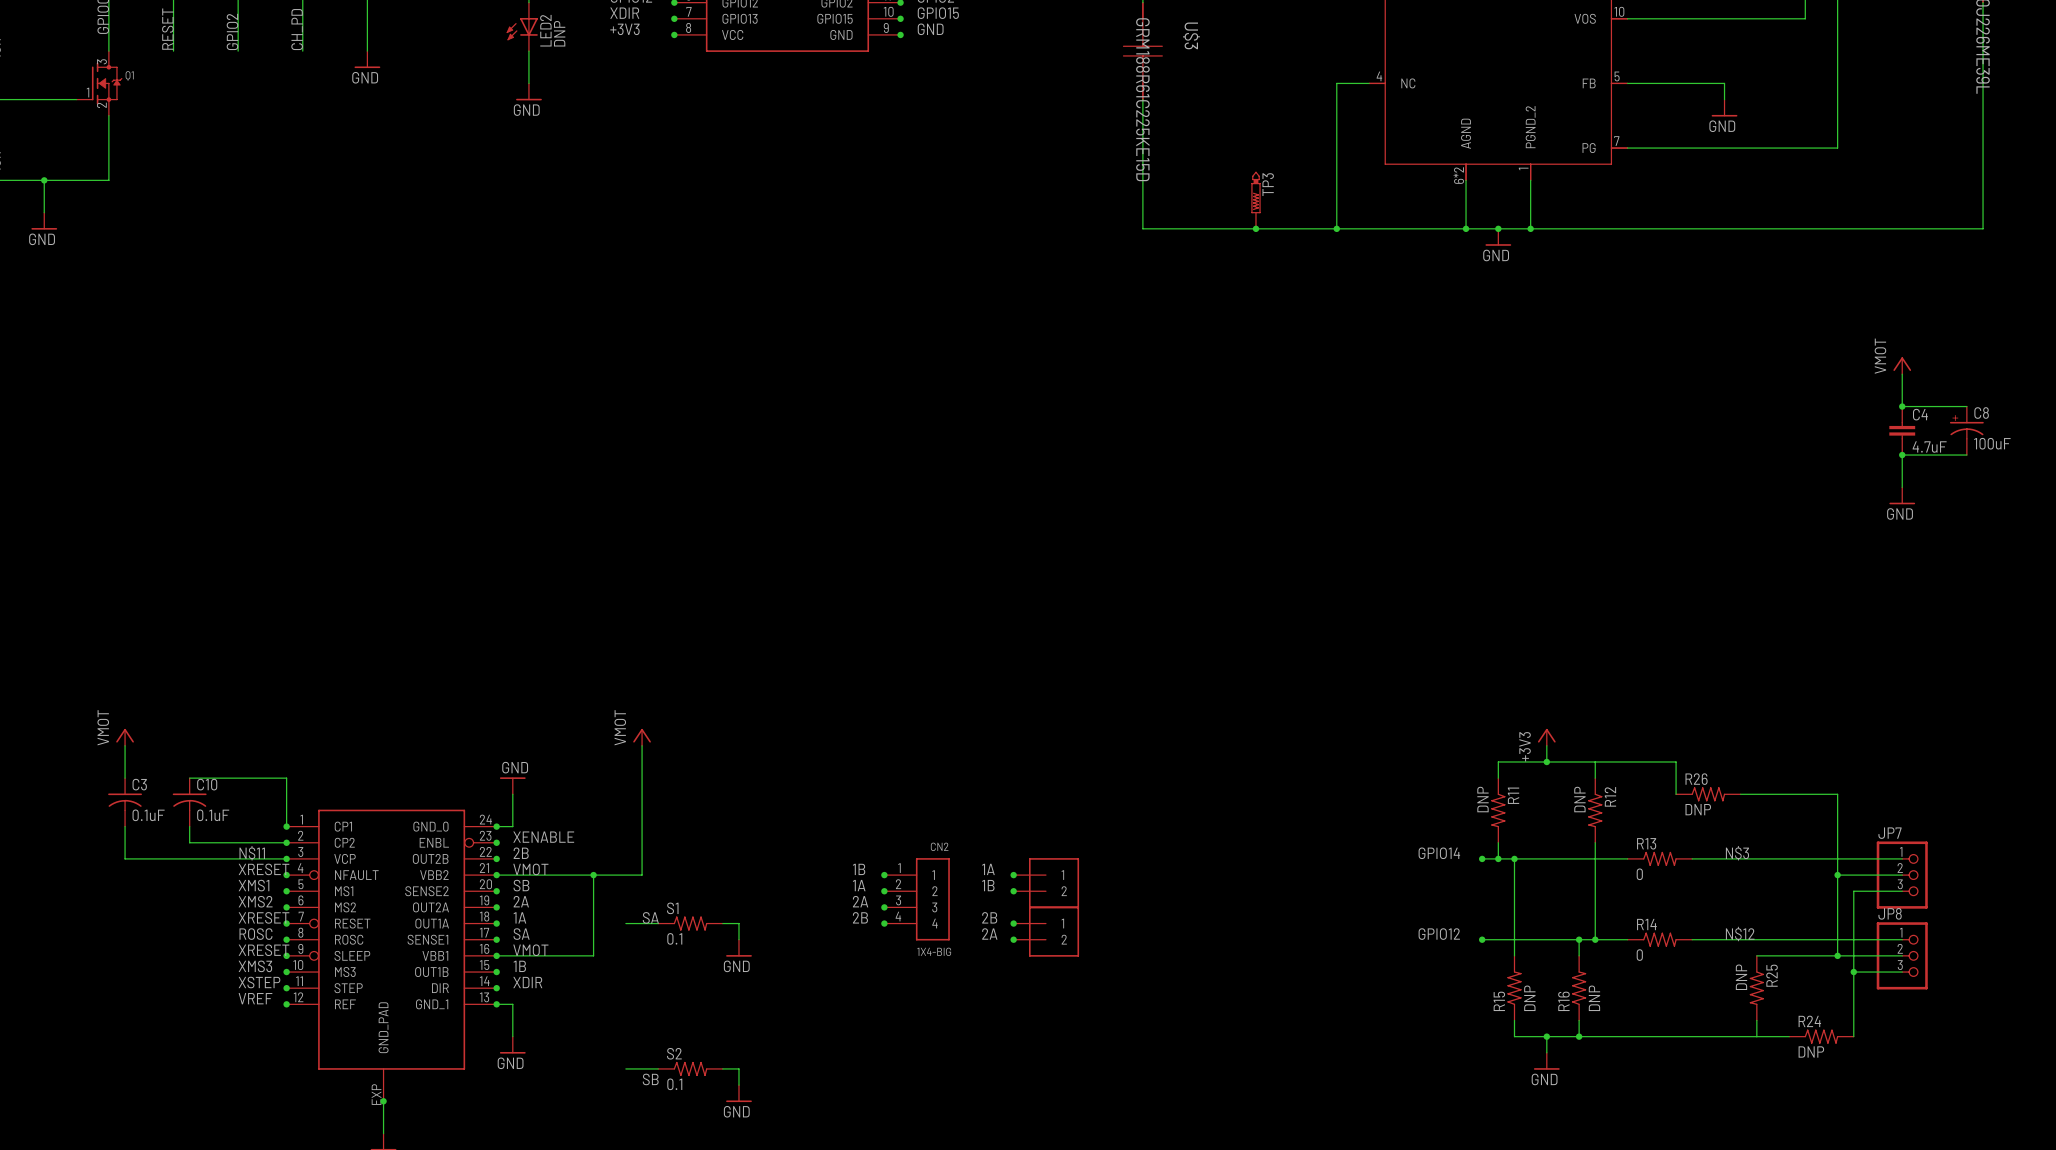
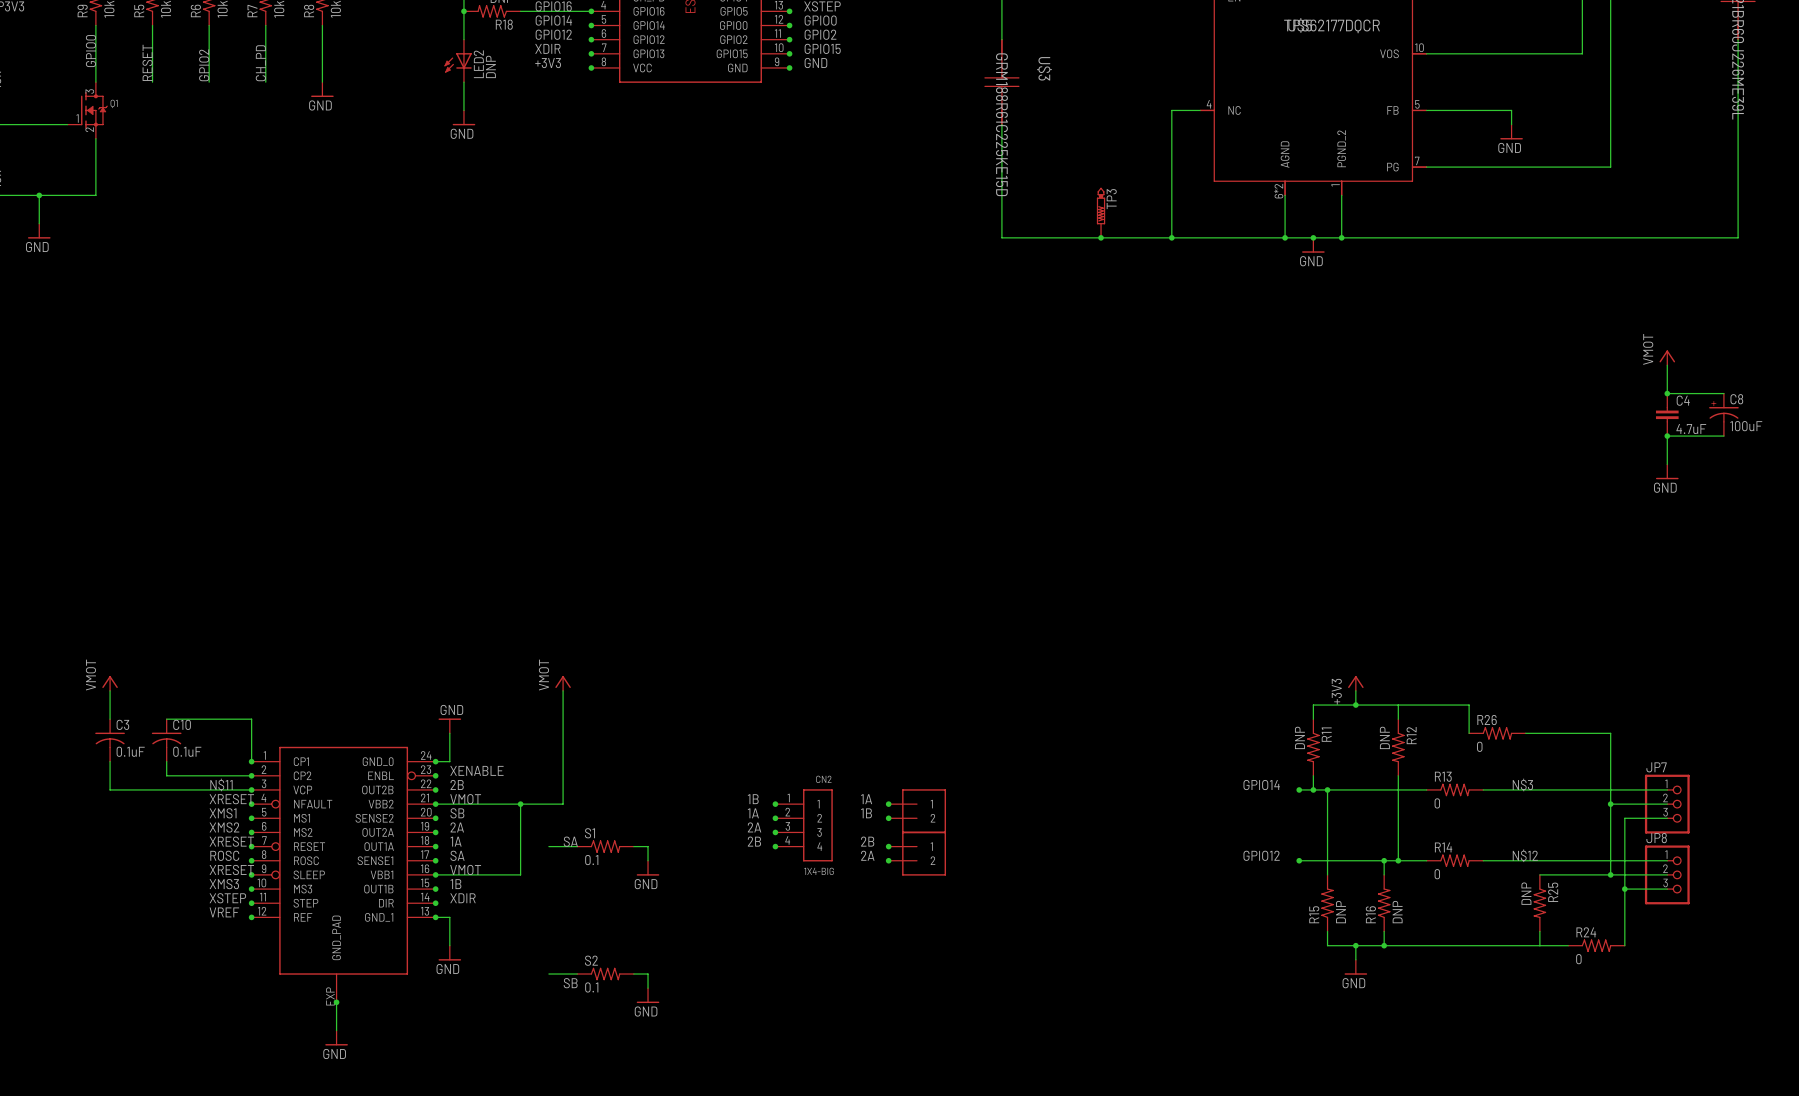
R26 value: DNP (1698, 809) -> 0 (1479, 746)
R24 value: DNP (1811, 1051) -> 0 (1578, 959)

